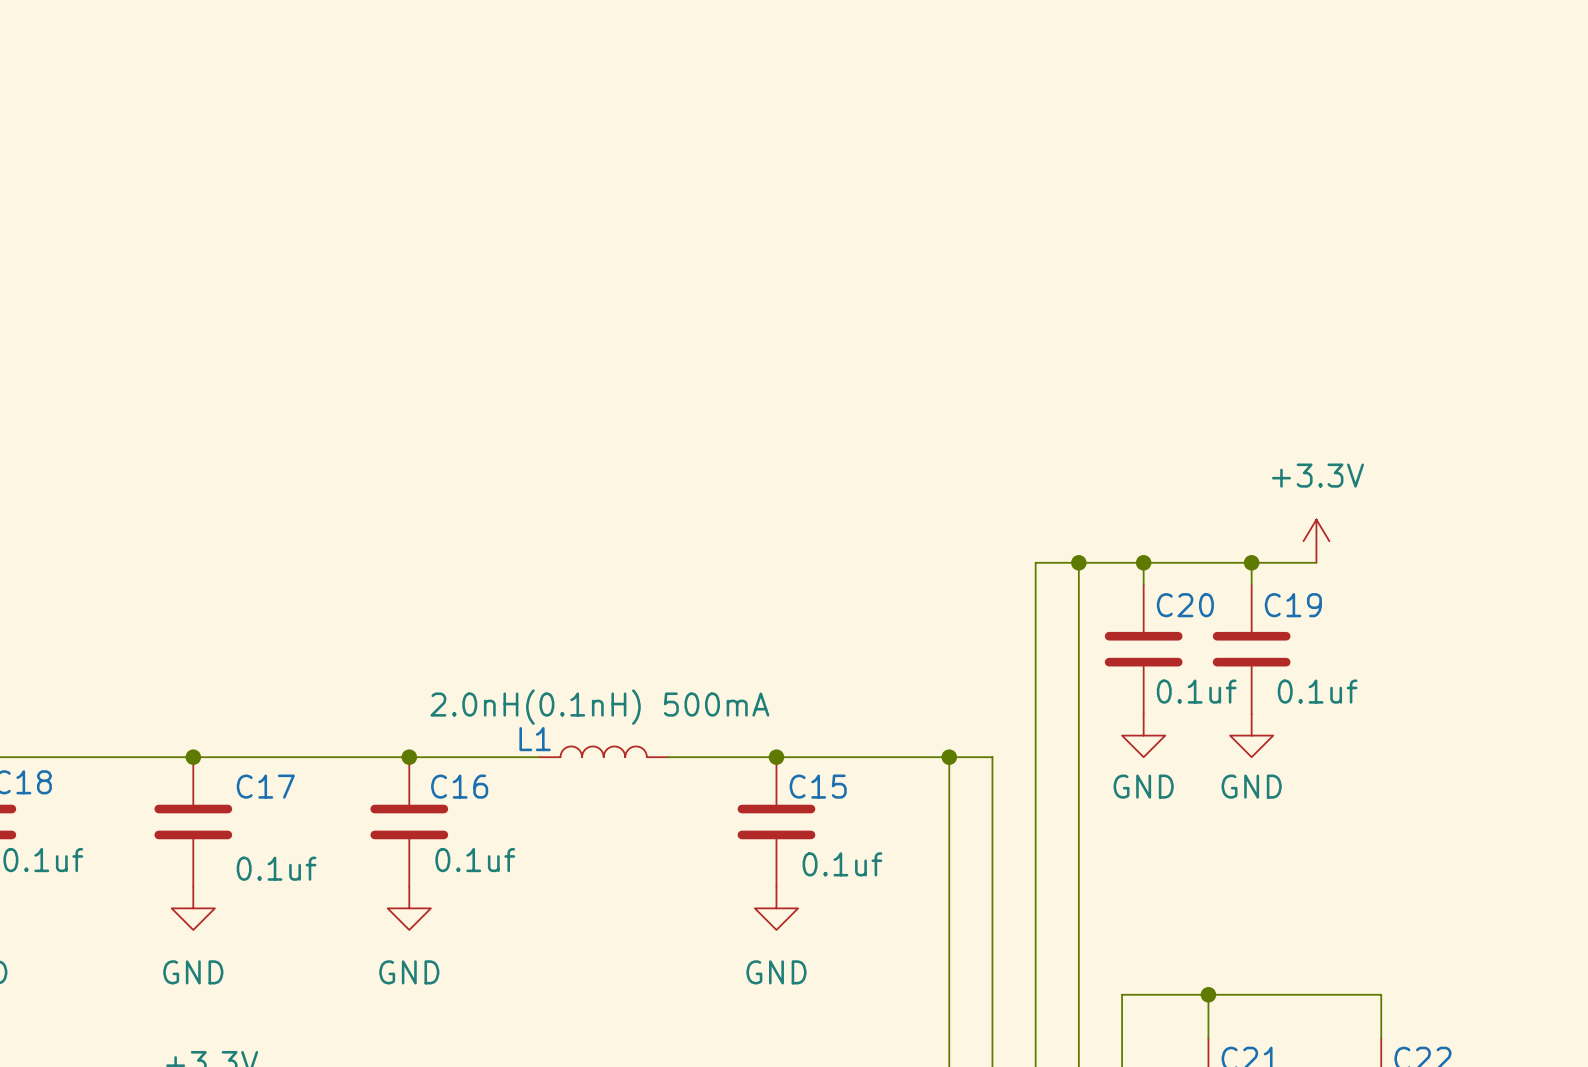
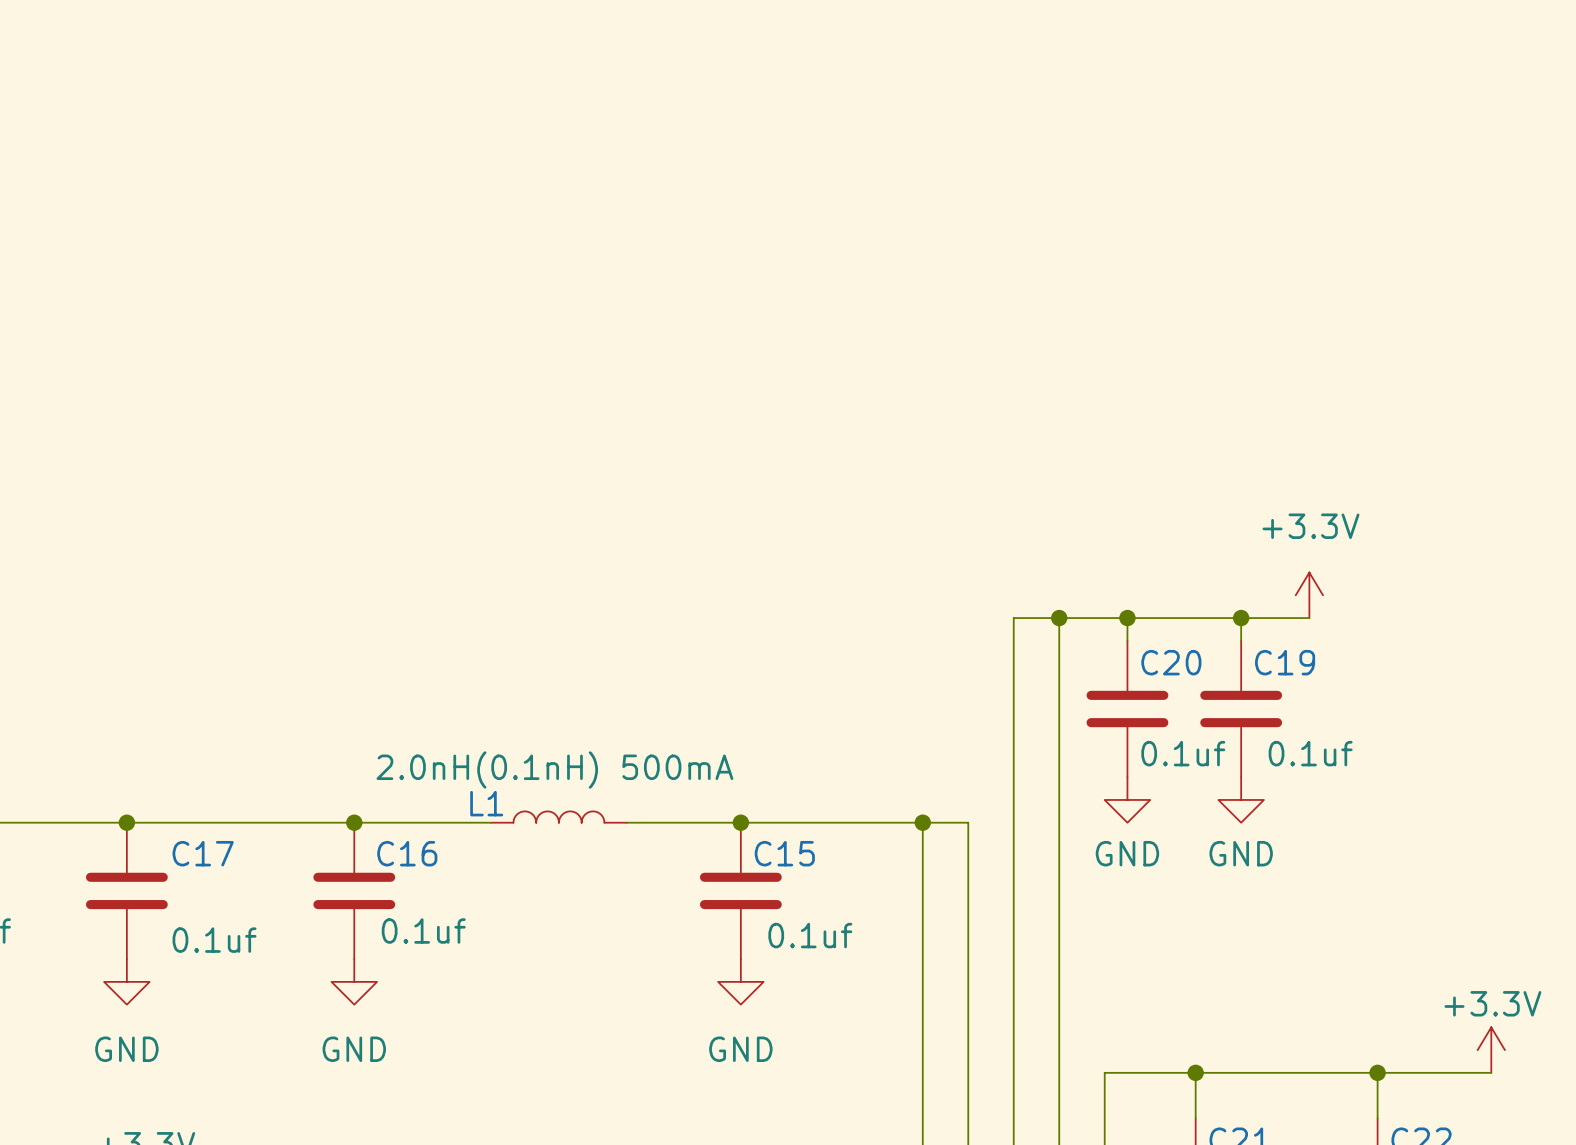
power symbol: none -> +3.3V (1491, 1050)
wire: none -> (1377, 1072) (1491, 1072)
junction: none -> (1377, 1072)

